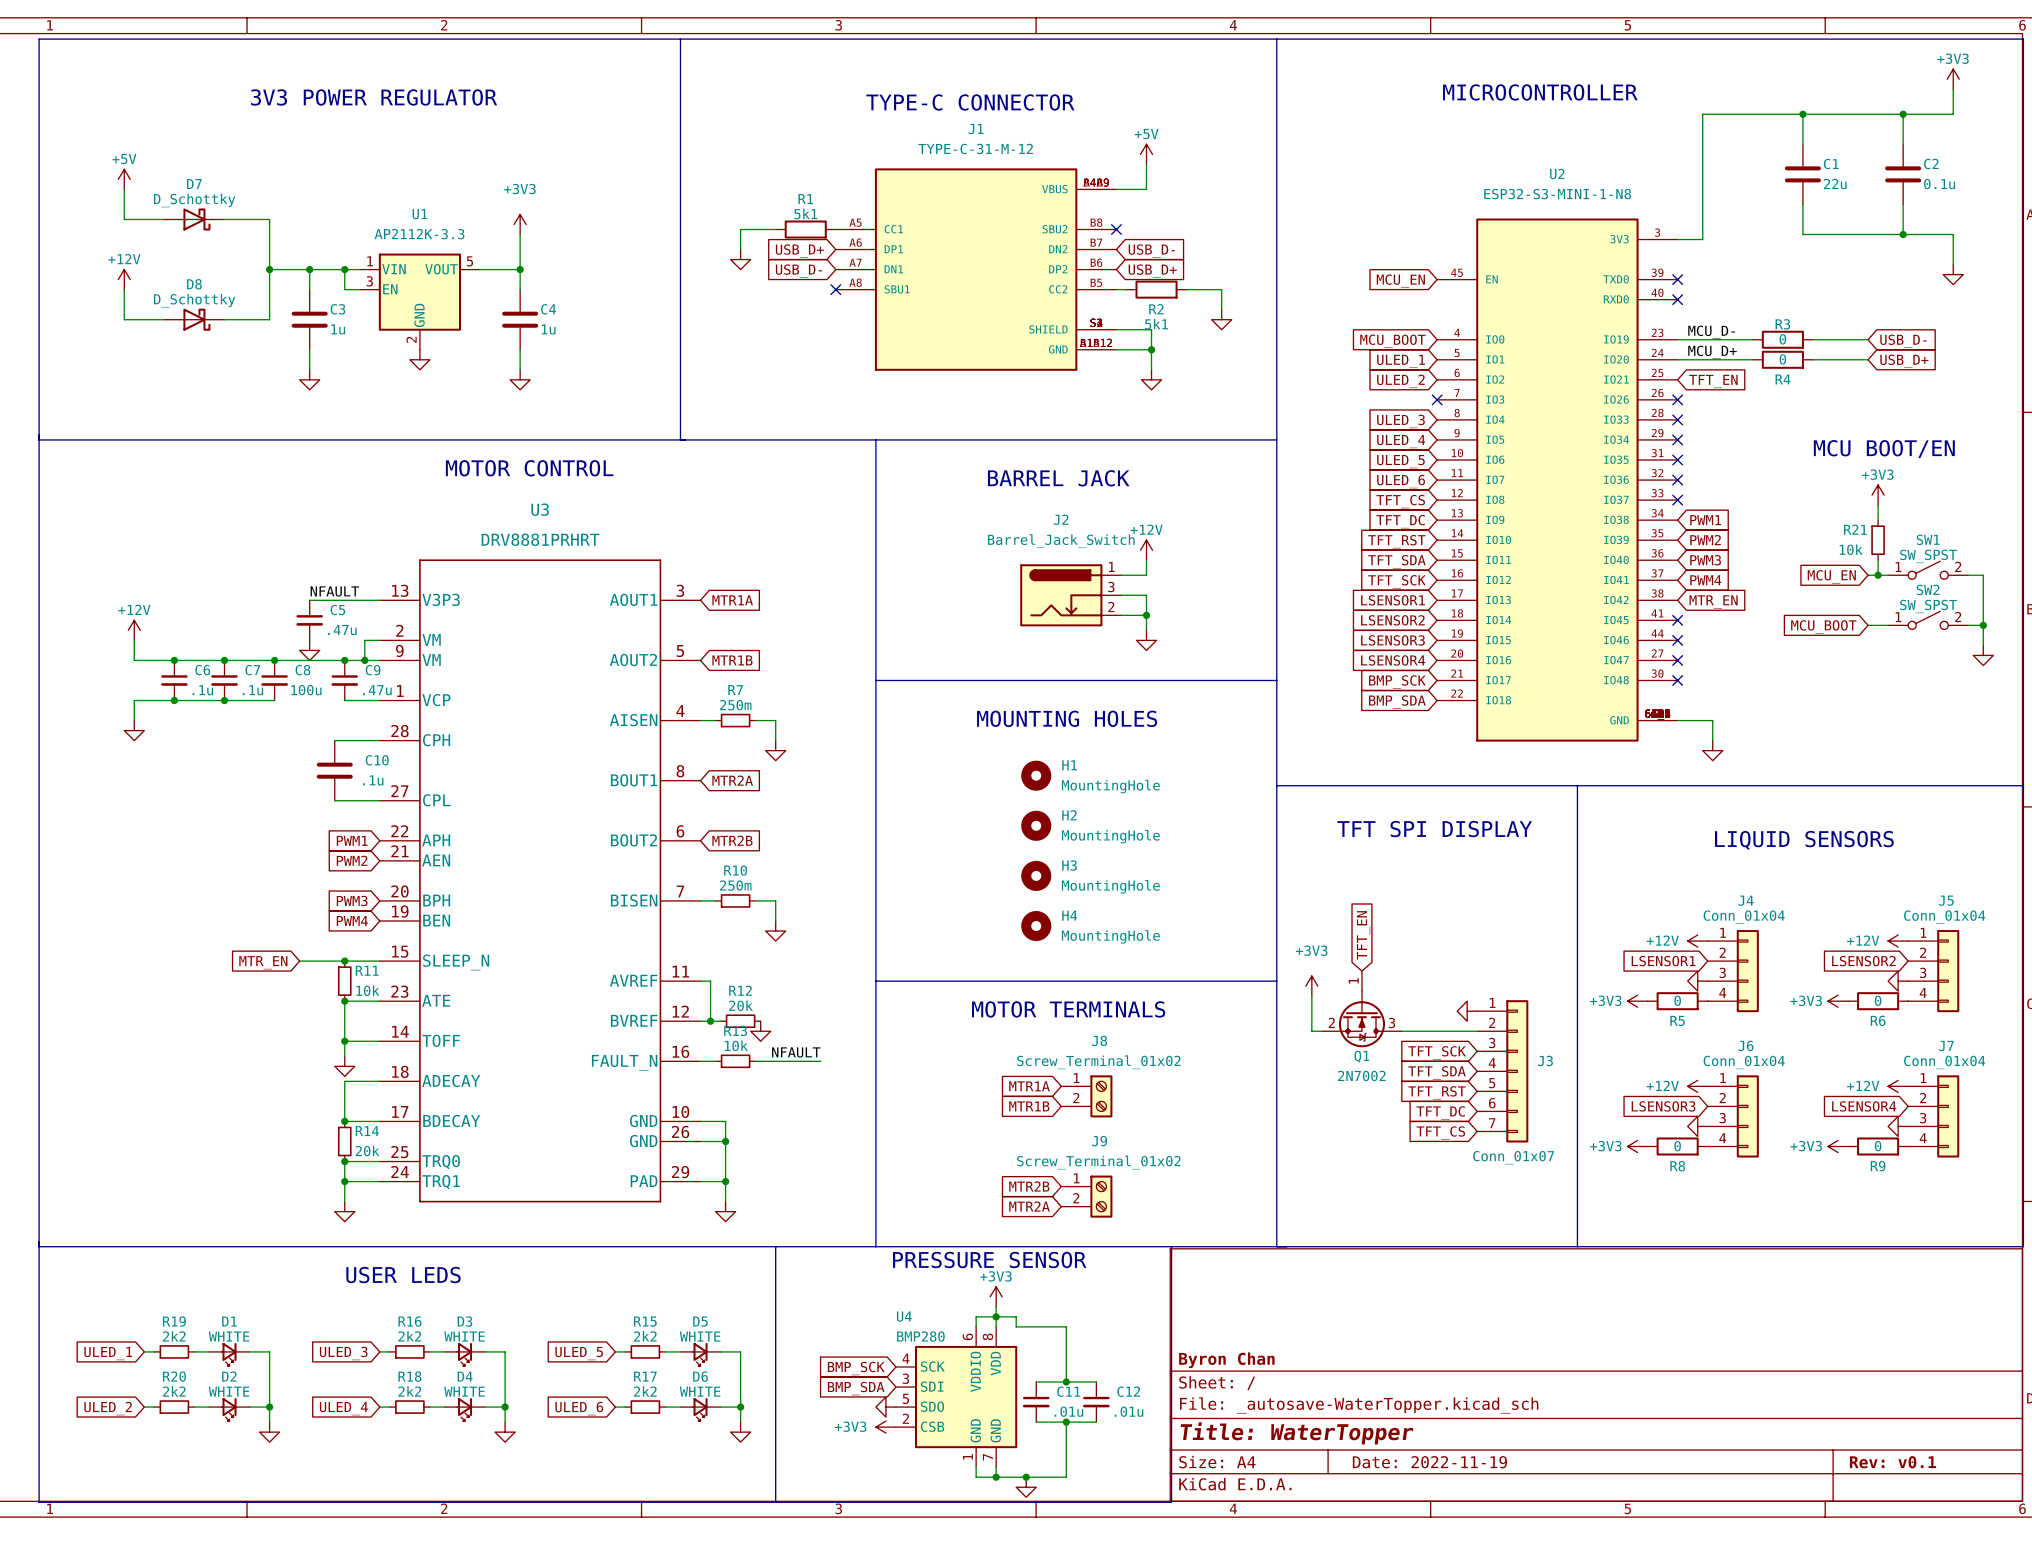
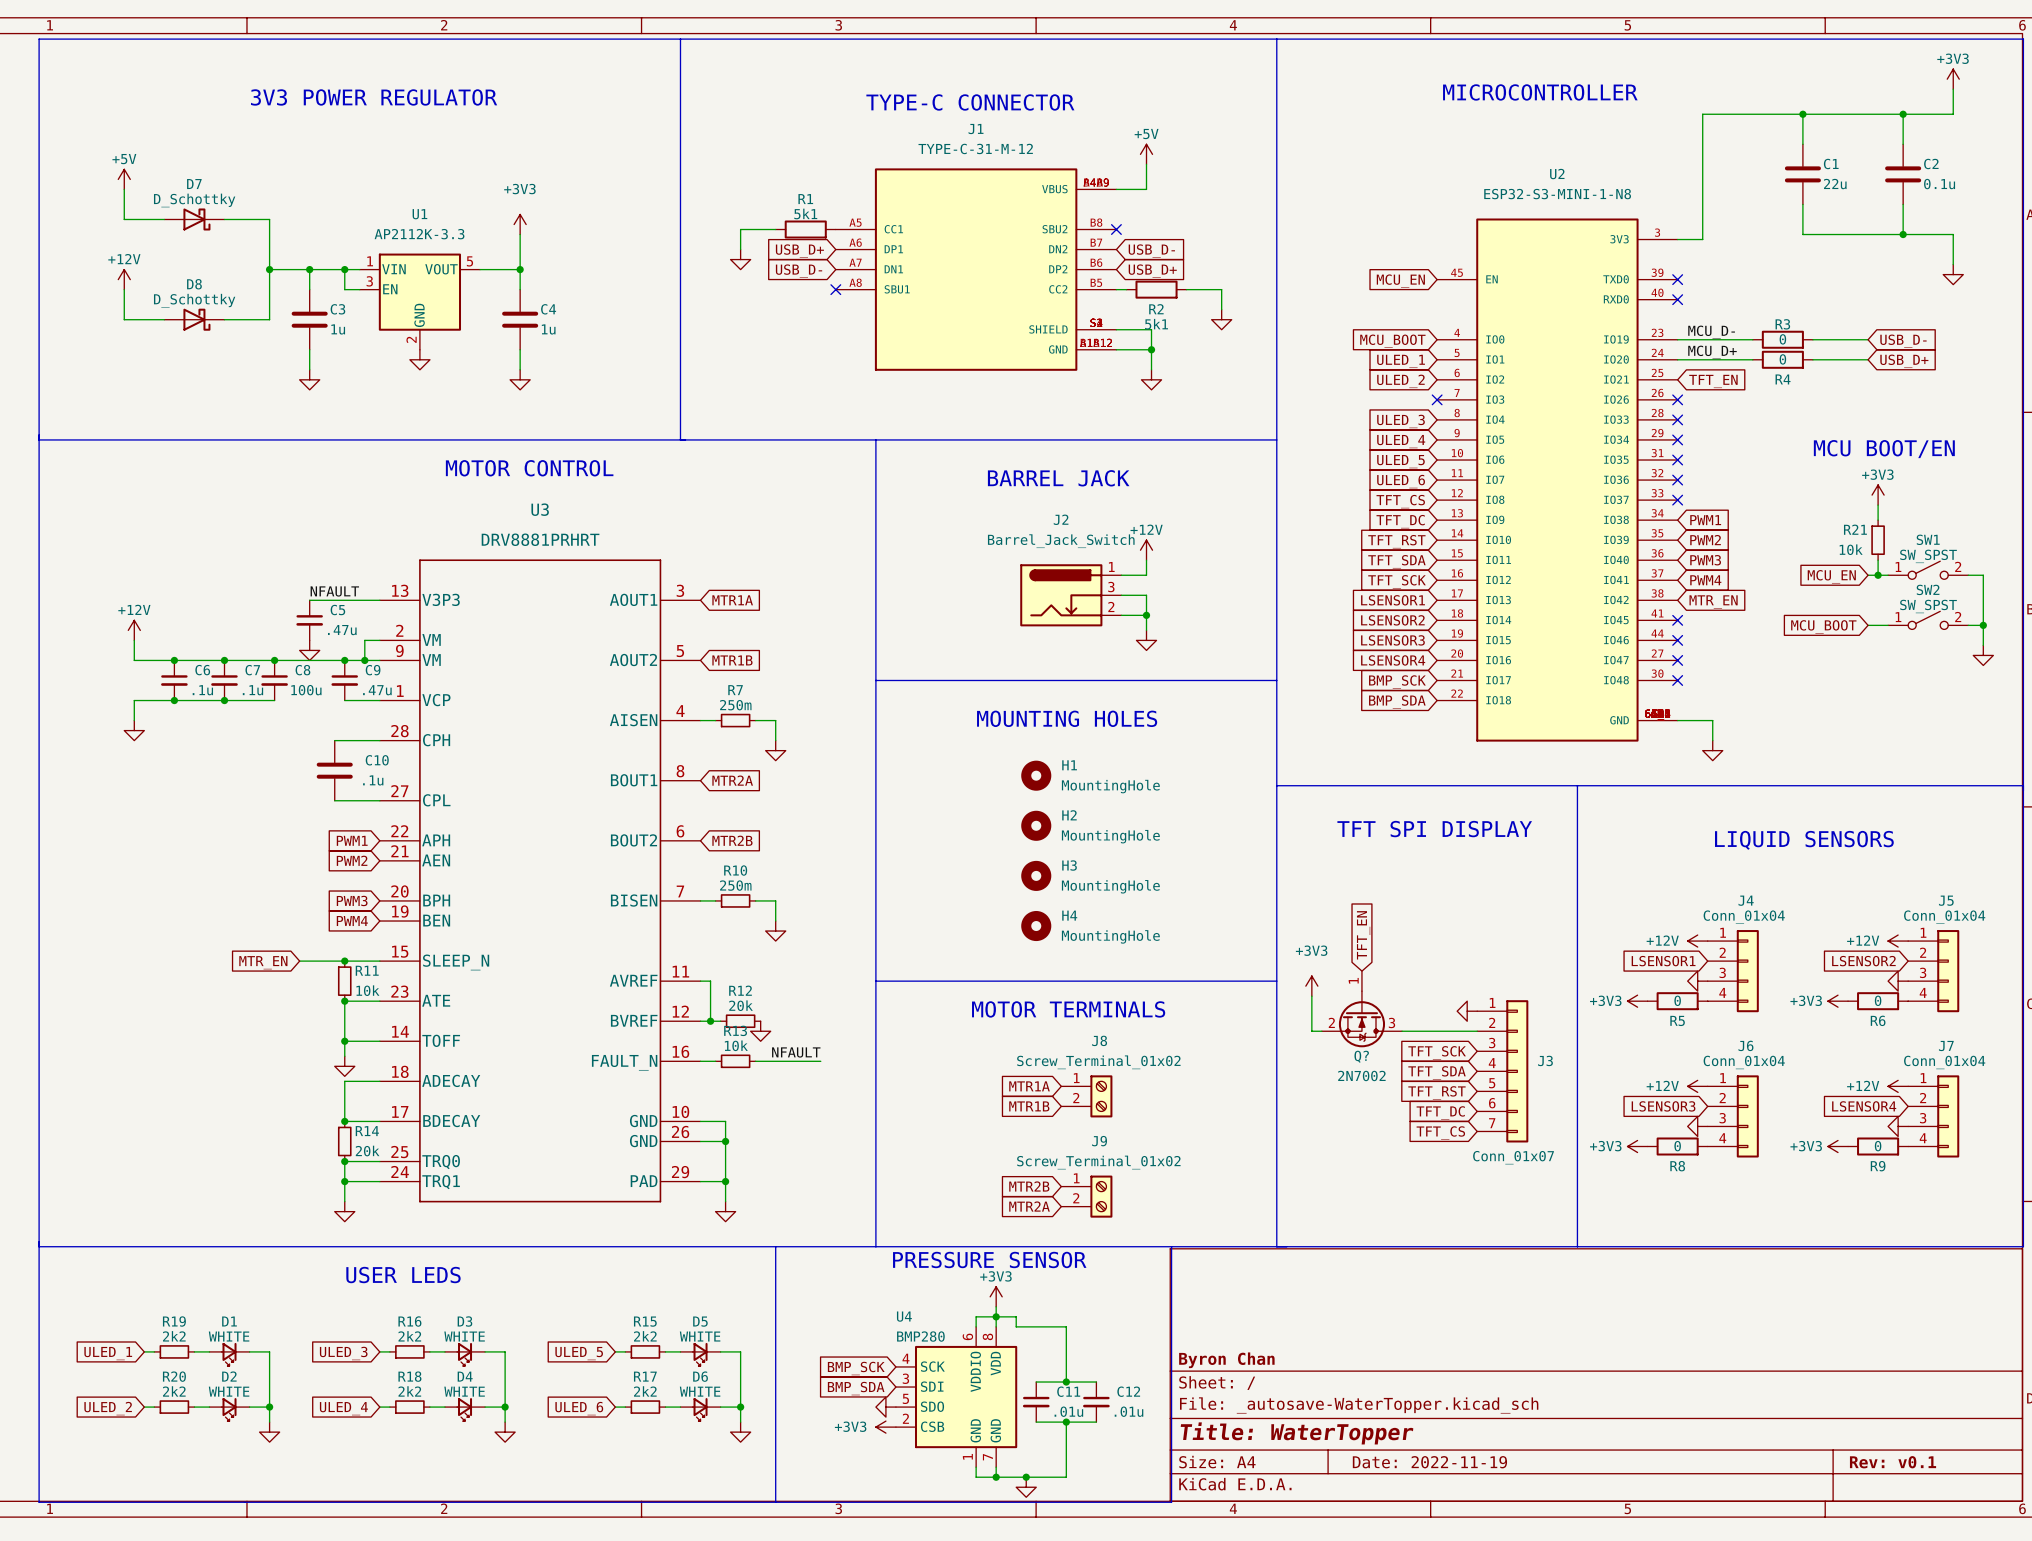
Q1 name: Q1 (1361, 1056) -> Q? (1361, 1056)

